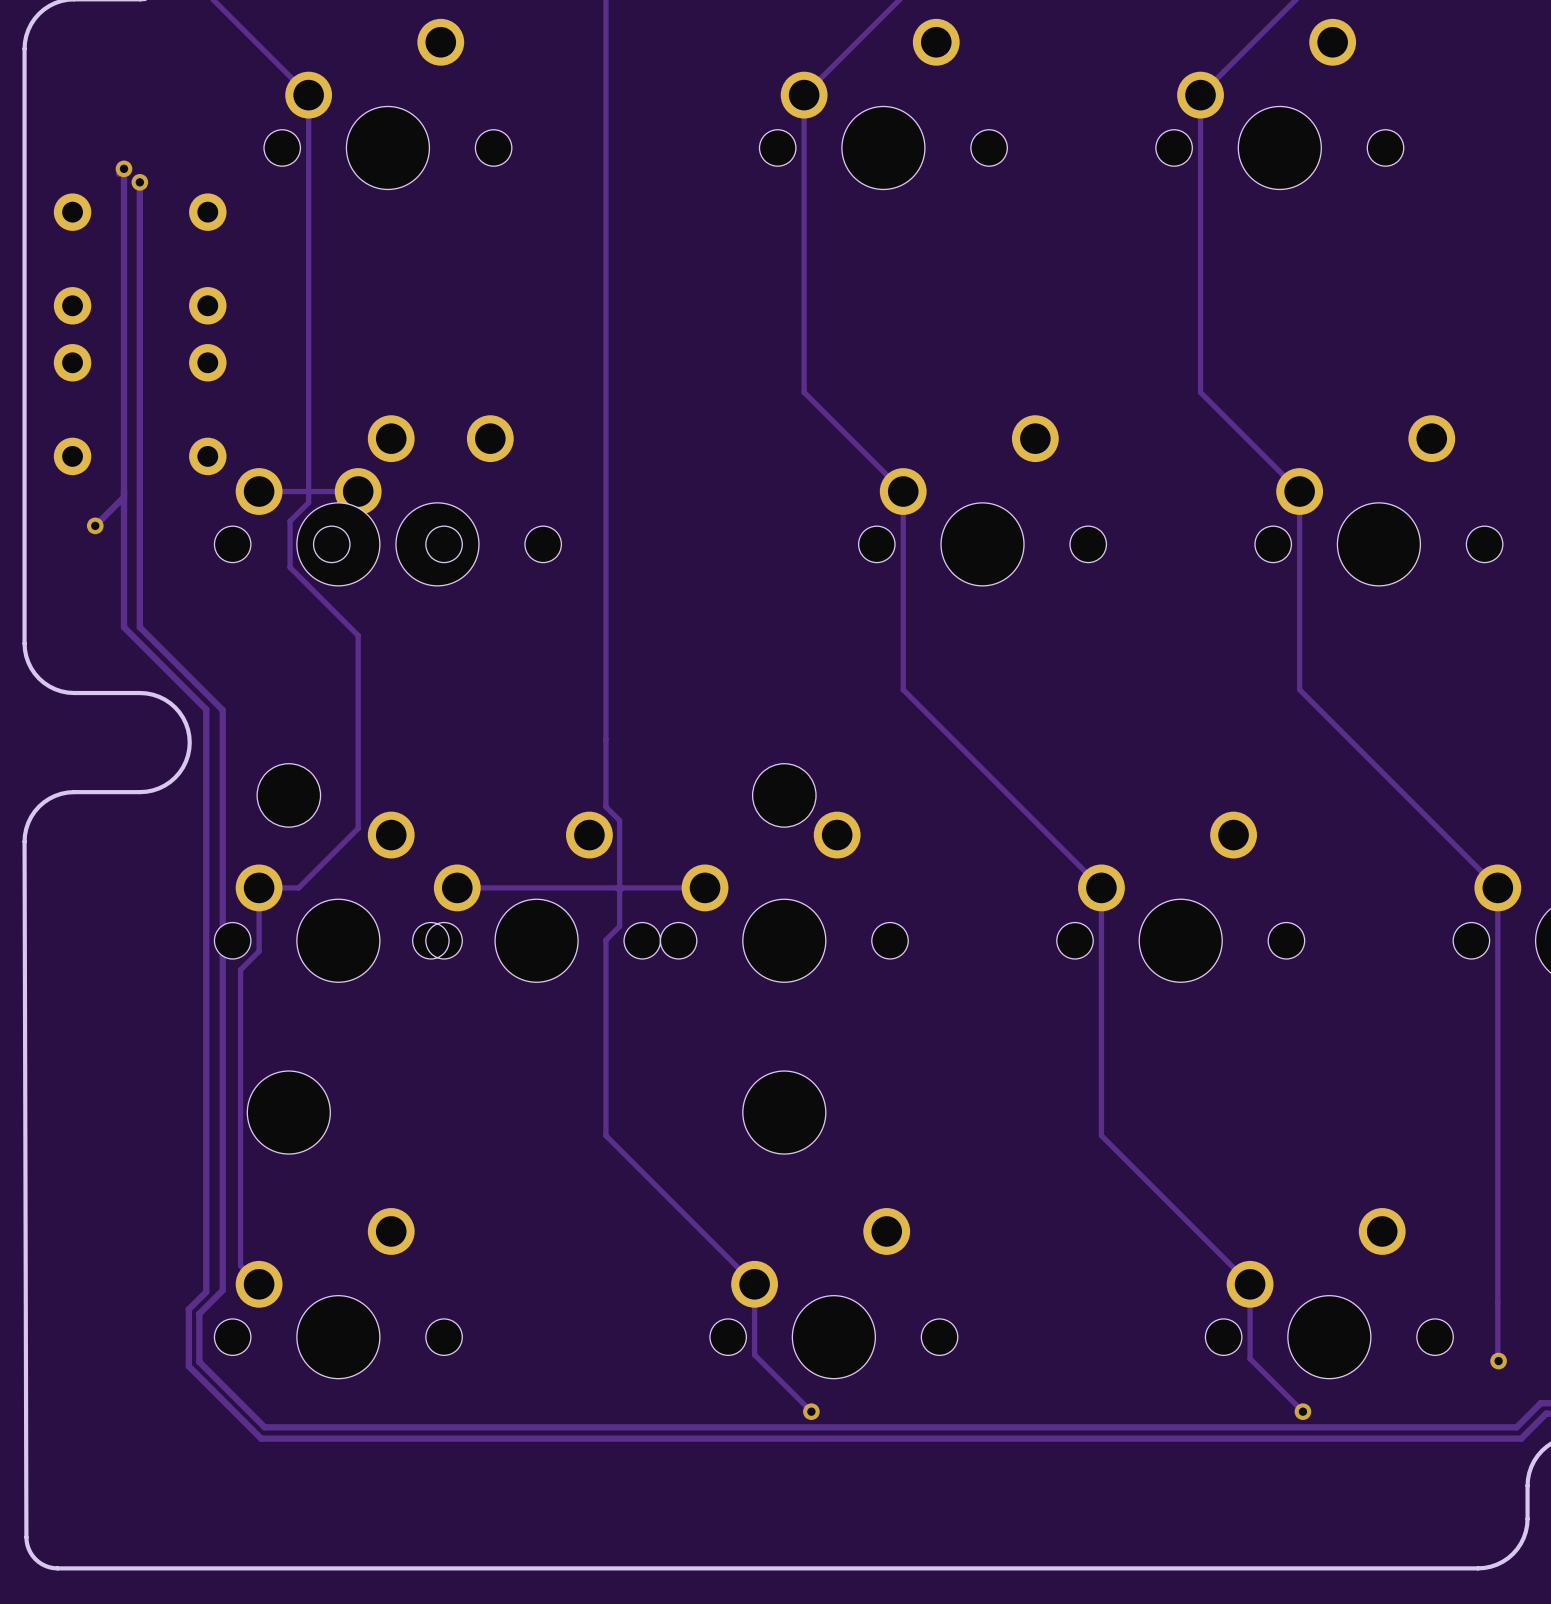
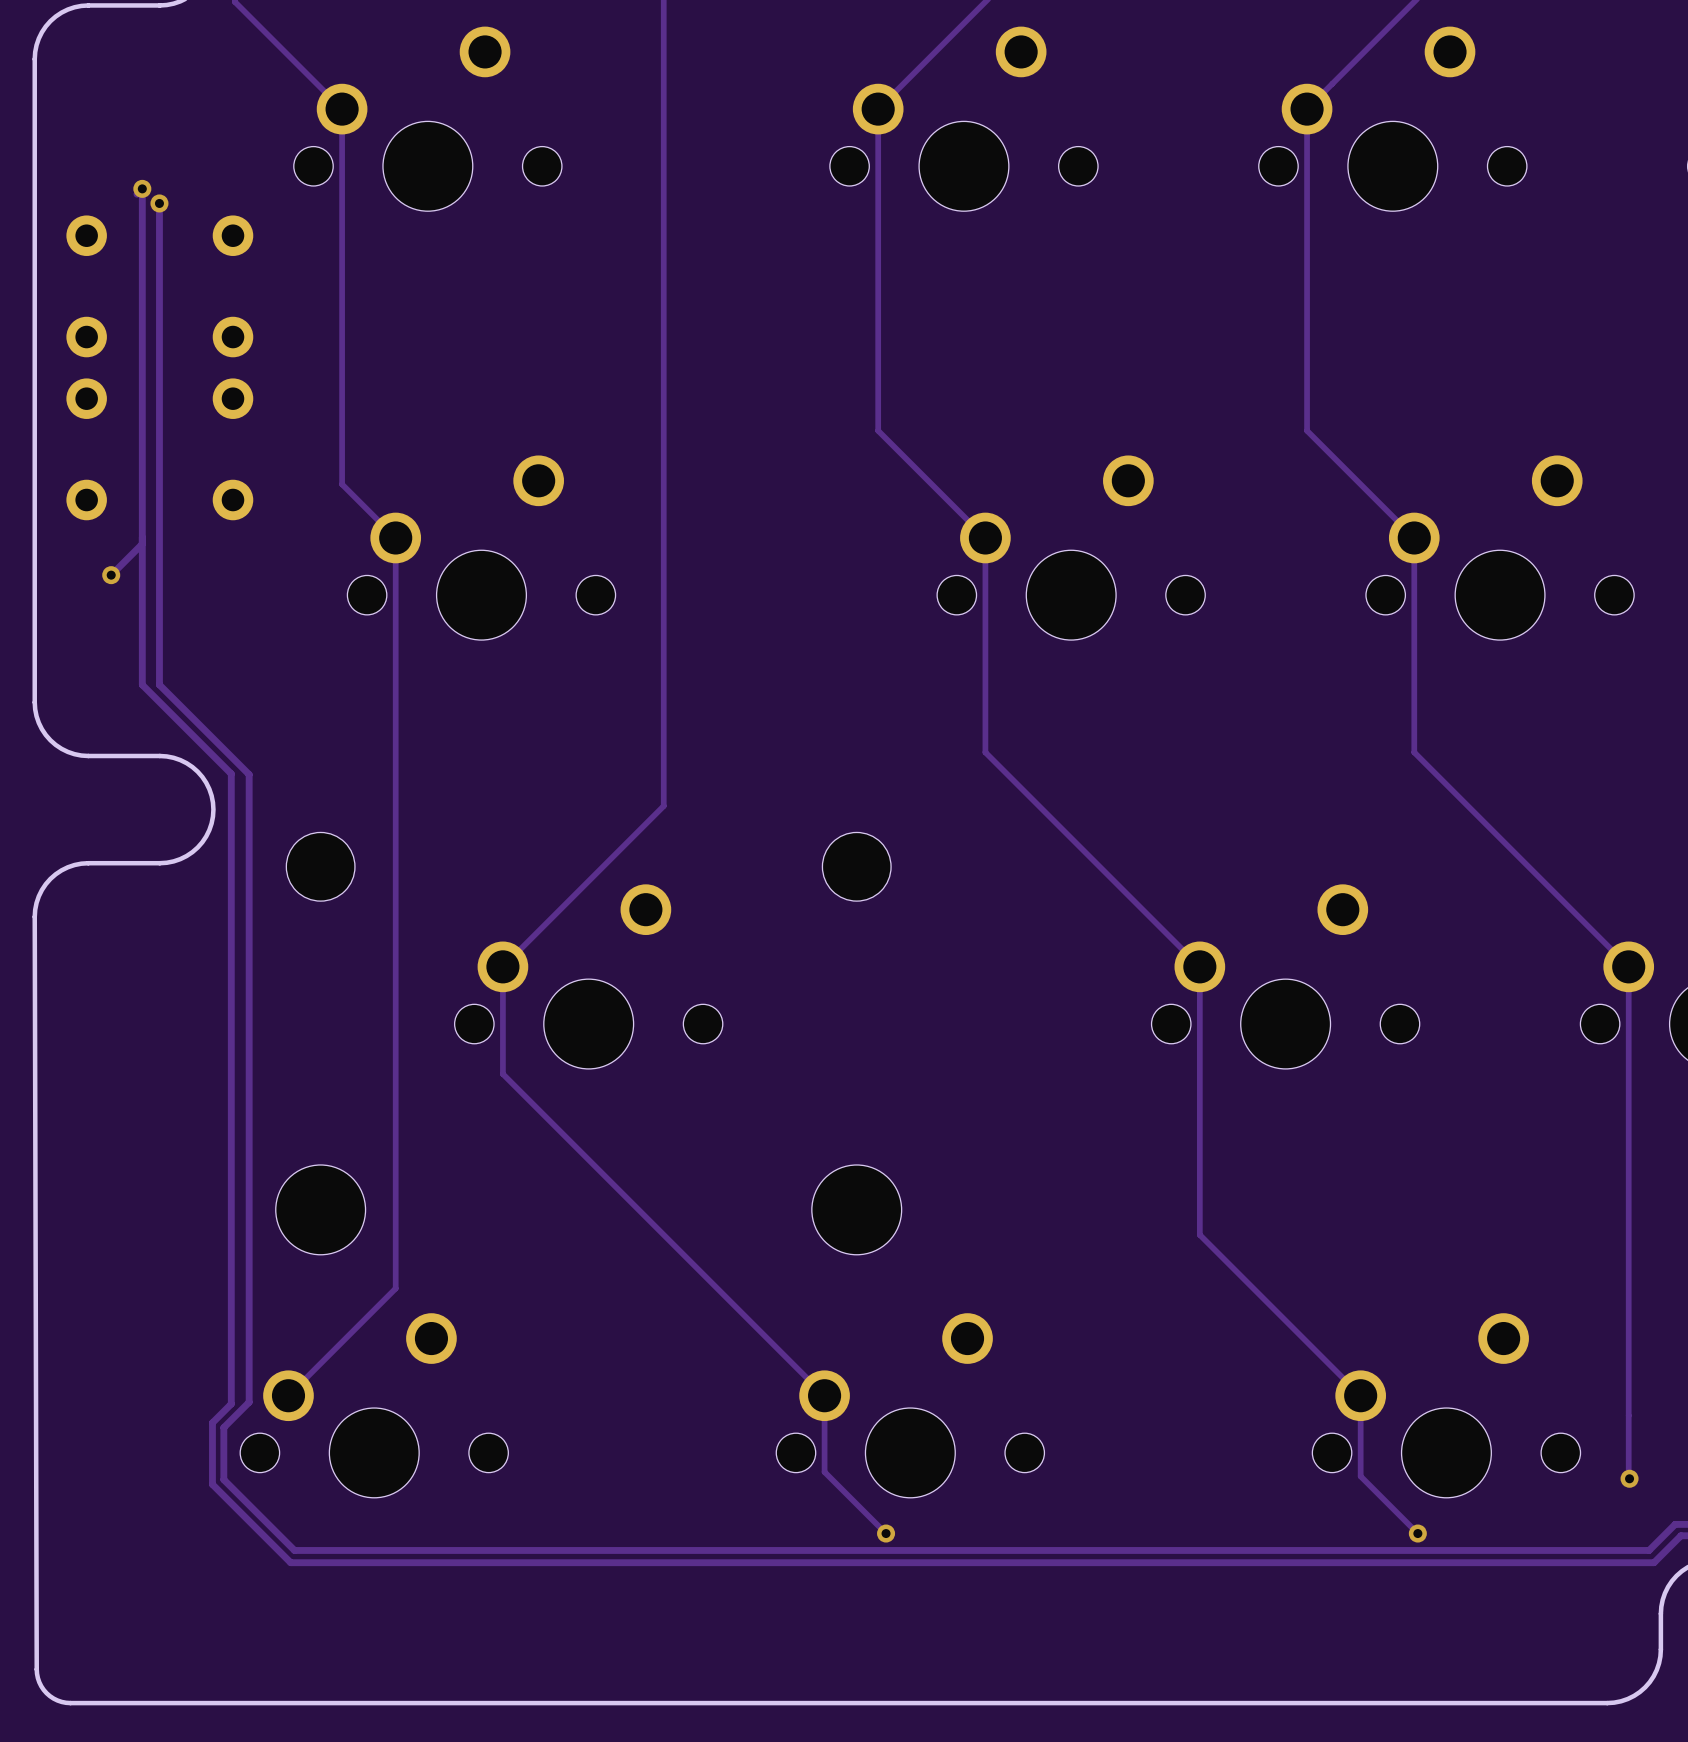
track: (308, 441) (308, 502) (290, 521) (290, 567) (358, 635) -> (342, 484) (395, 537) (395, 693)
track: (259, 491) (358, 491) -> none
part: (338, 500) -> none
track: (605, 739) (605, 806) (619, 820) (619, 926) (605, 940) (605, 1135) -> (663, 806) (502, 966) (502, 1074) (663, 1234)
track: (358, 828) (298, 887) (259, 887) (259, 951) (240, 969) (240, 1265) (259, 1284) -> (395, 902) (395, 1288) (288, 1395)
track: (457, 887) (616, 887) (619, 890) (622, 887) (705, 887) -> none
part: (338, 896) -> none
part: (784, 896) -> none

